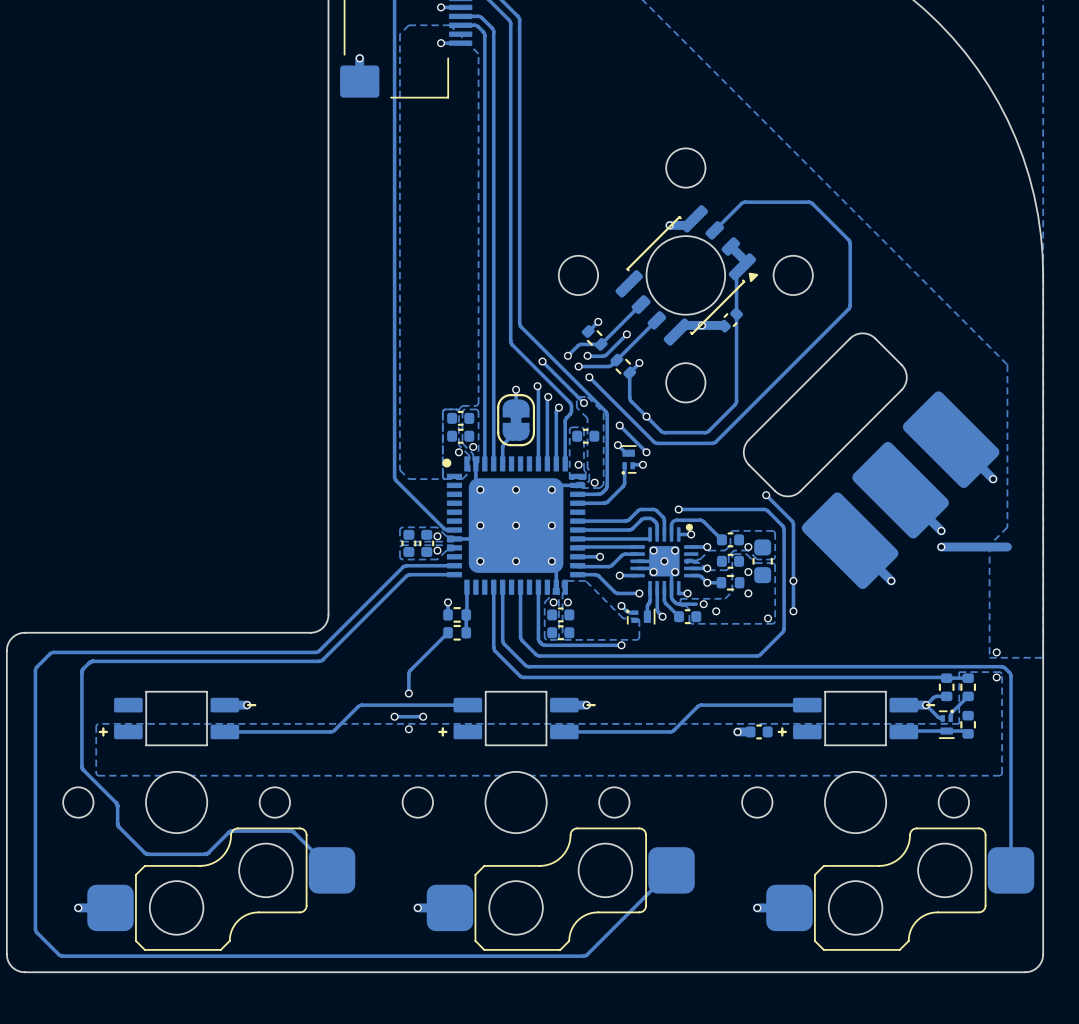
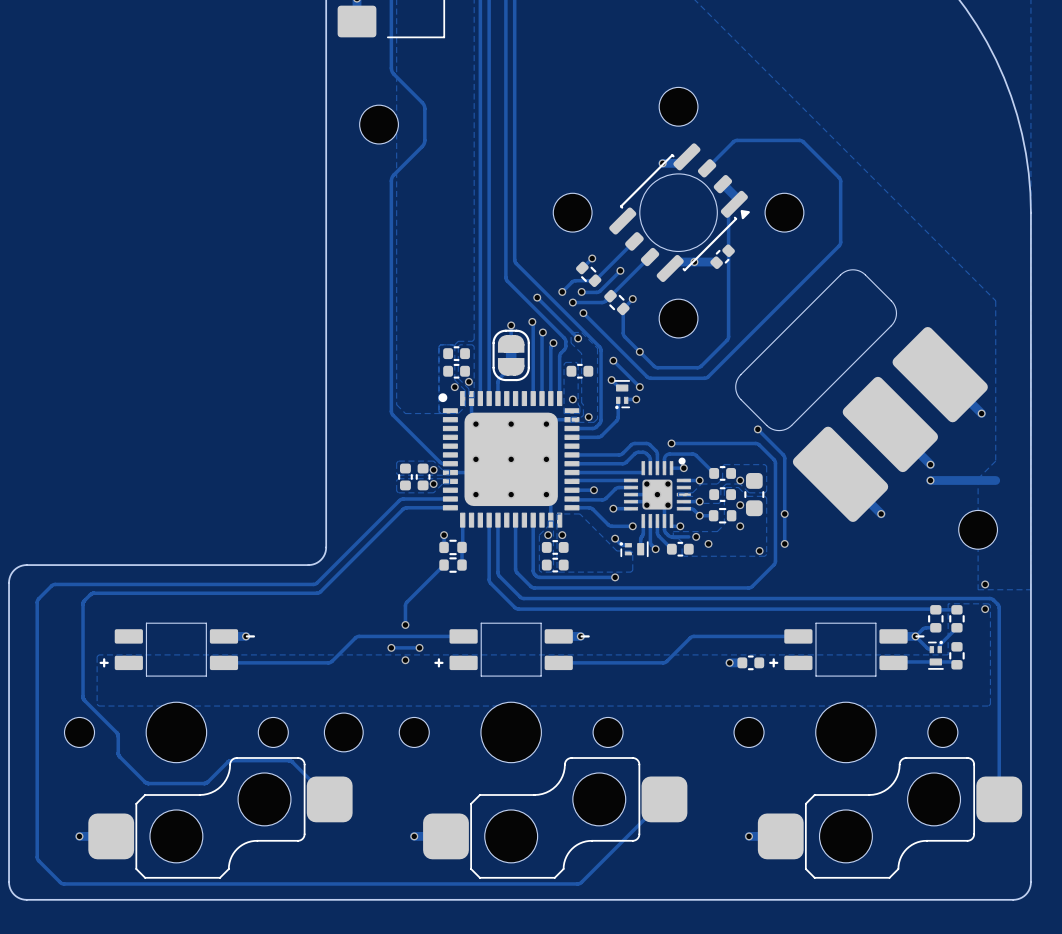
track: (394, 128) (394, 243) -> (391, 68) (393, 74) (422, 103) (424, 108) (424, 143) (393, 175) (391, 181)
part: none -> (379, 124)
part: none -> (978, 529)
part: none -> (343, 732)

